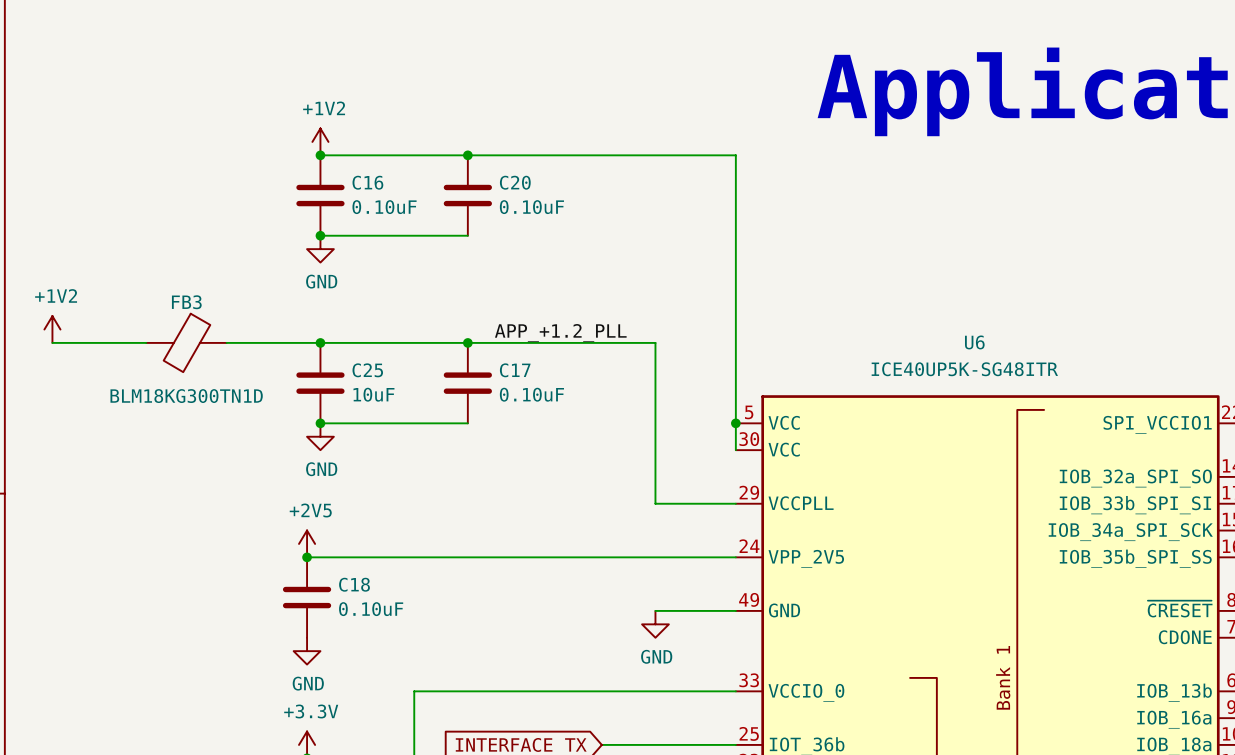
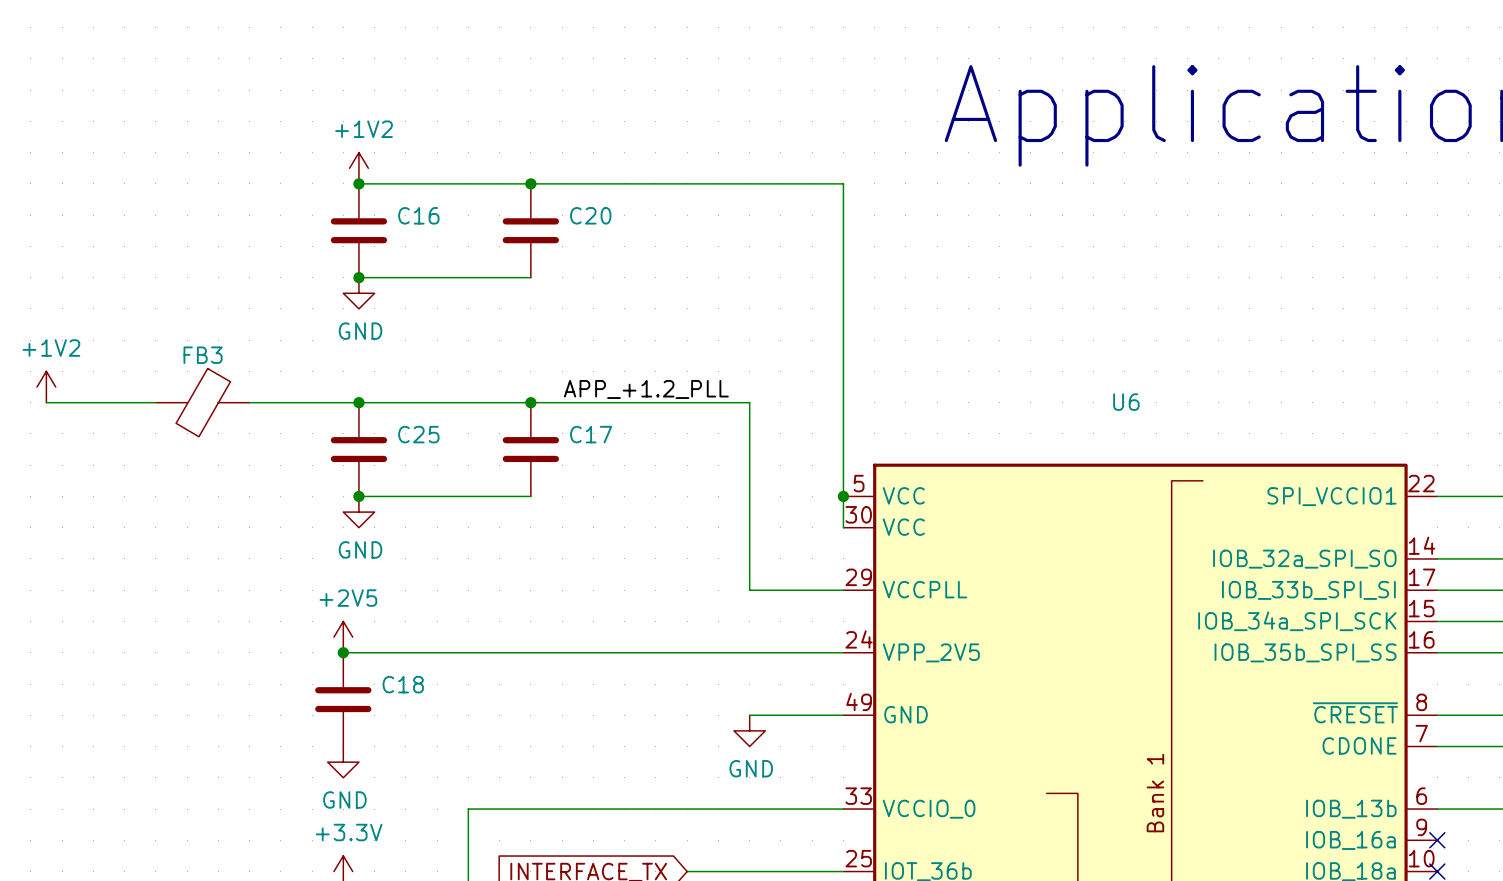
C16 value: 0.10uF (384, 207) -> none
C20 value: 0.10uF (531, 207) -> none
U6 value: ICE40UP5K-SG48ITR (964, 369) -> none
C25 value: 10uF (373, 394) -> none
C17 value: 0.10uF (531, 394) -> none
FB3 value: BLM18KG300TN1D (186, 396) -> none
C18 value: 0.10uF (371, 609) -> none

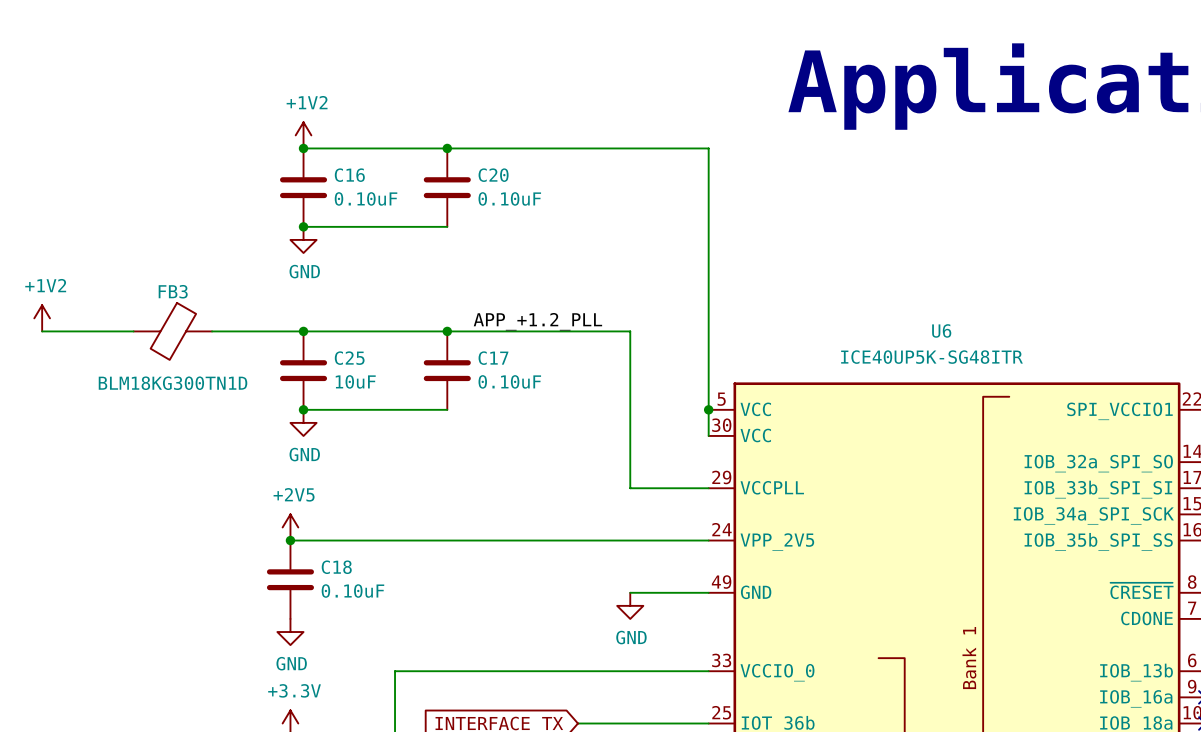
C16 value: none -> 0.10uF (366, 198)
C20 value: none -> 0.10uF (509, 198)
U6 value: none -> ICE40UP5K-SG48ITR (931, 357)
C25 value: none -> 10uF (355, 381)
C17 value: none -> 0.10uF (509, 381)
FB3 value: none -> BLM18KG300TN1D (173, 383)
C18 value: none -> 0.10uF (352, 591)

